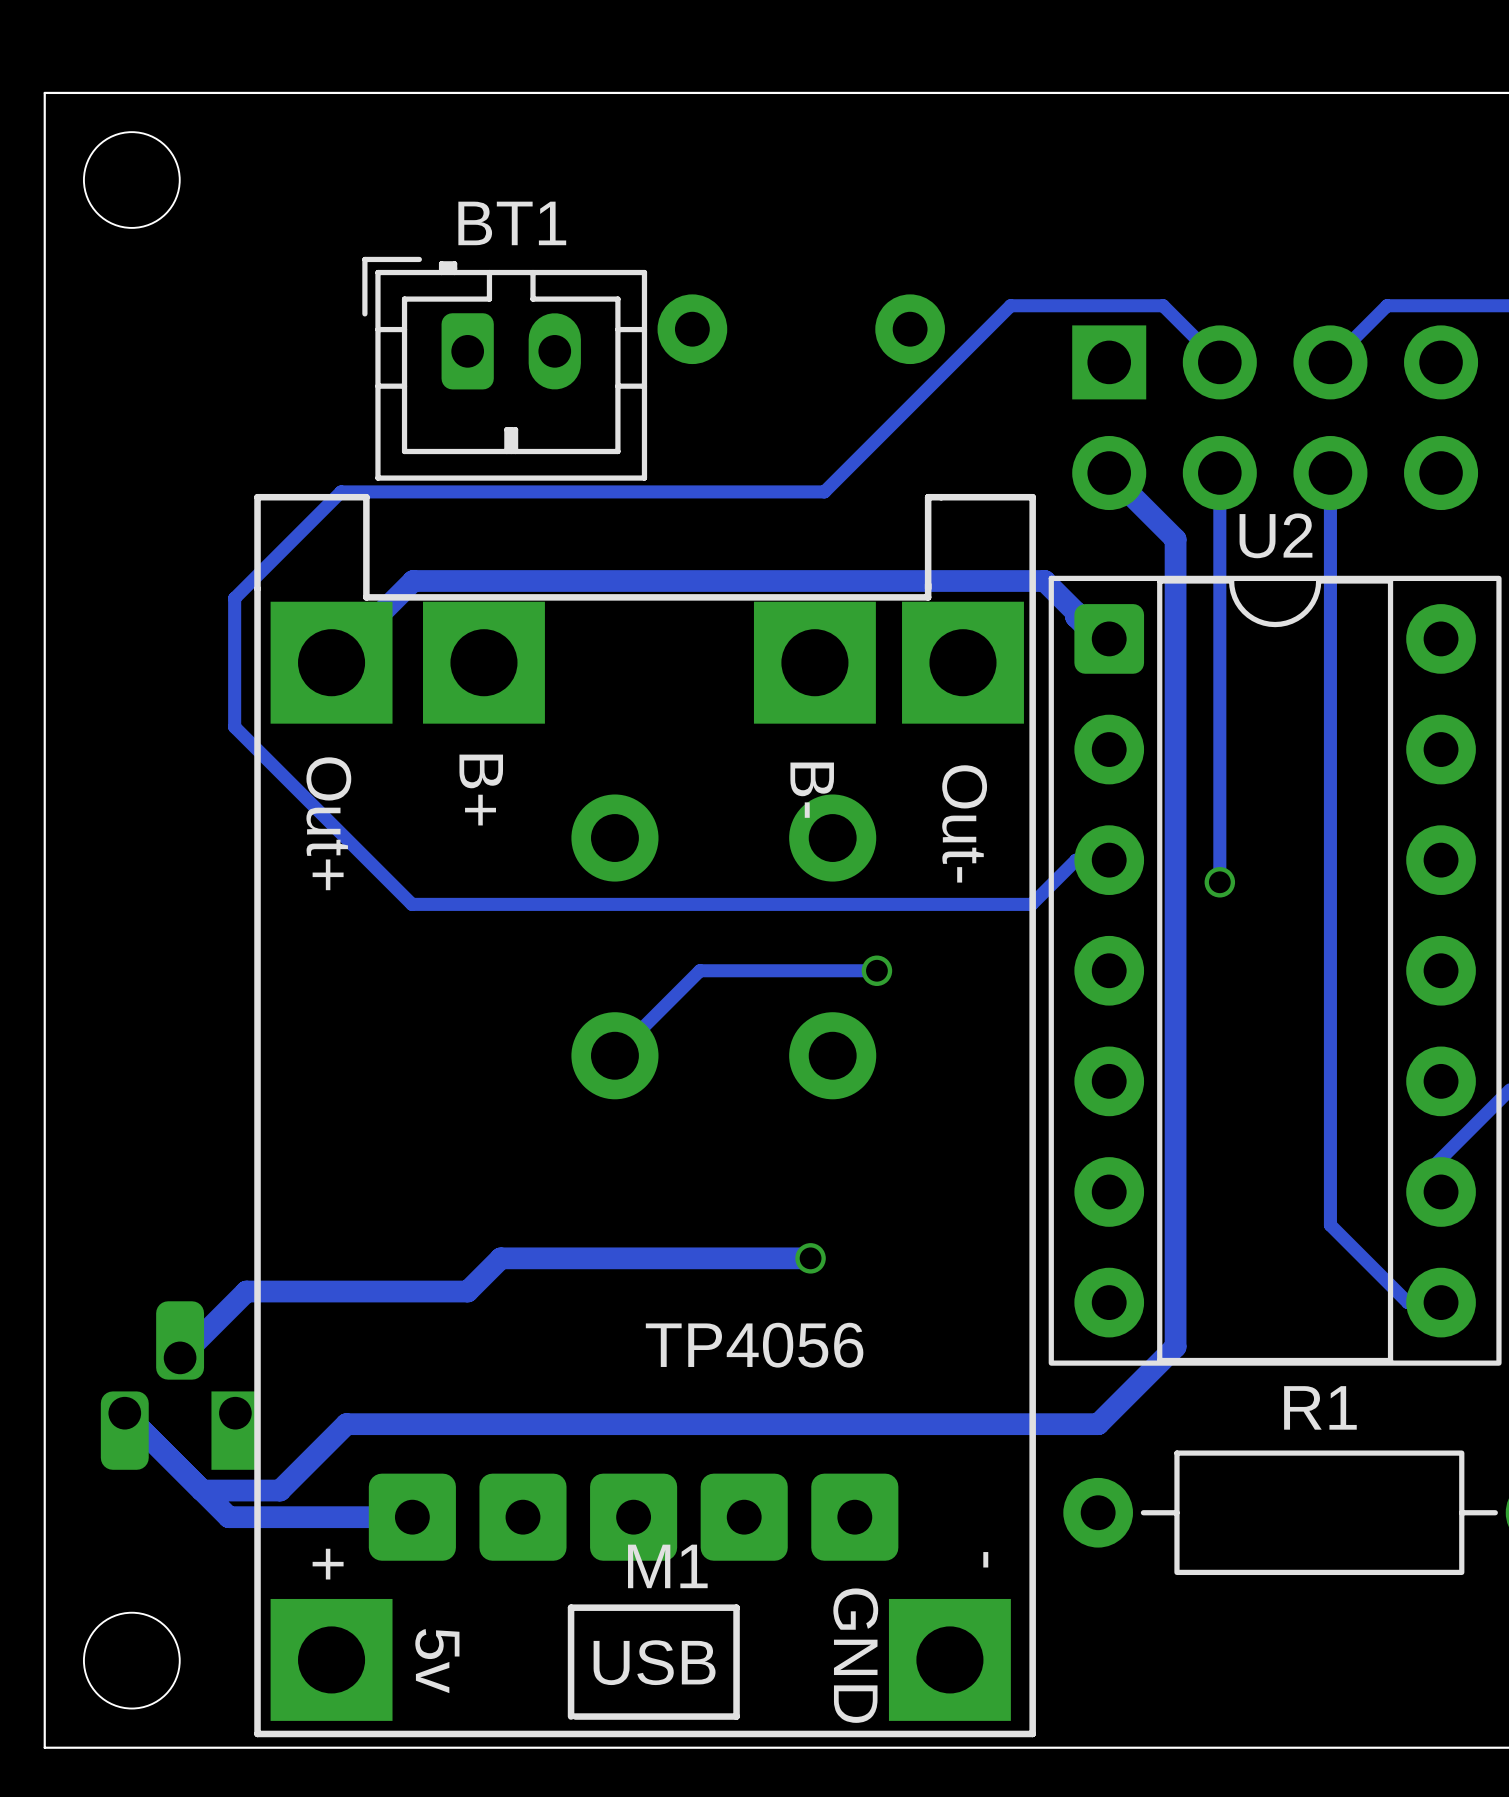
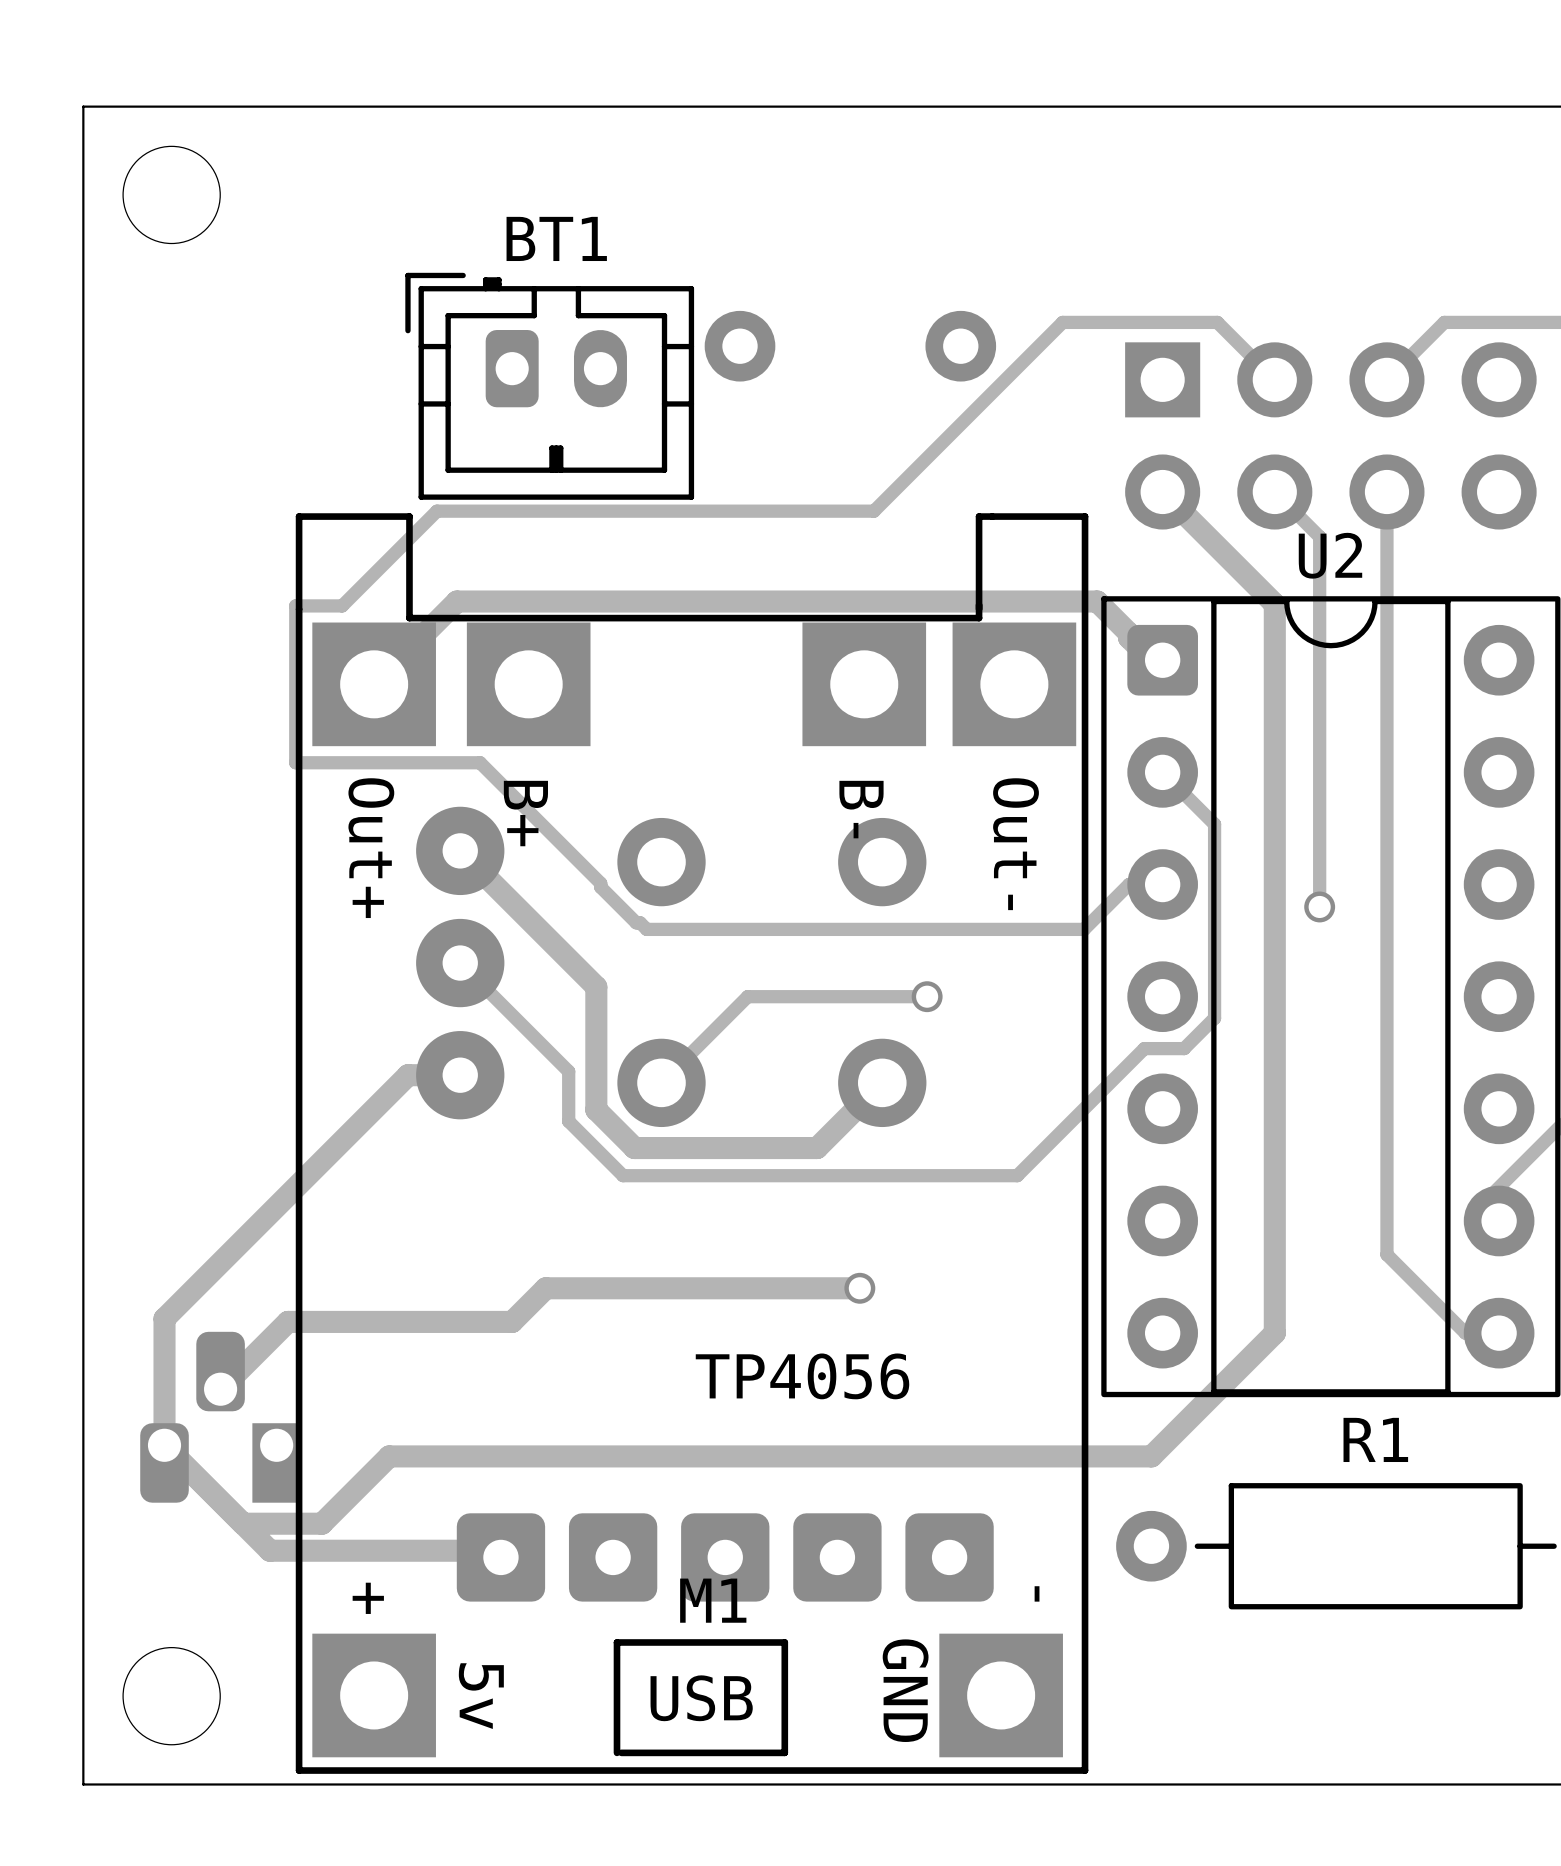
track: (1219, 473) (1219, 583) -> (1229, 559) (1274, 604)
track: none -> (1274, 492) (1319, 536) (1319, 906)
track: (393, 491) (341, 491) (234, 598) (234, 727) (412, 904) (600, 904) -> (436, 511) (342, 605) (295, 605) (295, 762) (480, 762) (600, 883) (600, 887) (636, 922) (640, 922) (646, 929)
track: (1175, 539) (1175, 1346) -> (1274, 906) (1274, 1333) (1229, 1378)
track width: thin (1219, 583) (1219, 882) -> thick (1274, 604) (1274, 906)
track: none -> (1162, 772) (1214, 824) (1214, 1018) (1184, 1048) (1144, 1048) (1017, 1175) (623, 1175) (568, 1121) (568, 1071) (460, 963)
track: none -> (460, 850) (596, 986) (596, 1109) (634, 1148) (817, 1148) (882, 1082)
via position: (1219, 882) -> (1319, 906)
part: none -> (460, 963)
track: none -> (460, 1075) (408, 1075) (164, 1318) (164, 1445)
part position: (633, 1517) -> (725, 1557)

